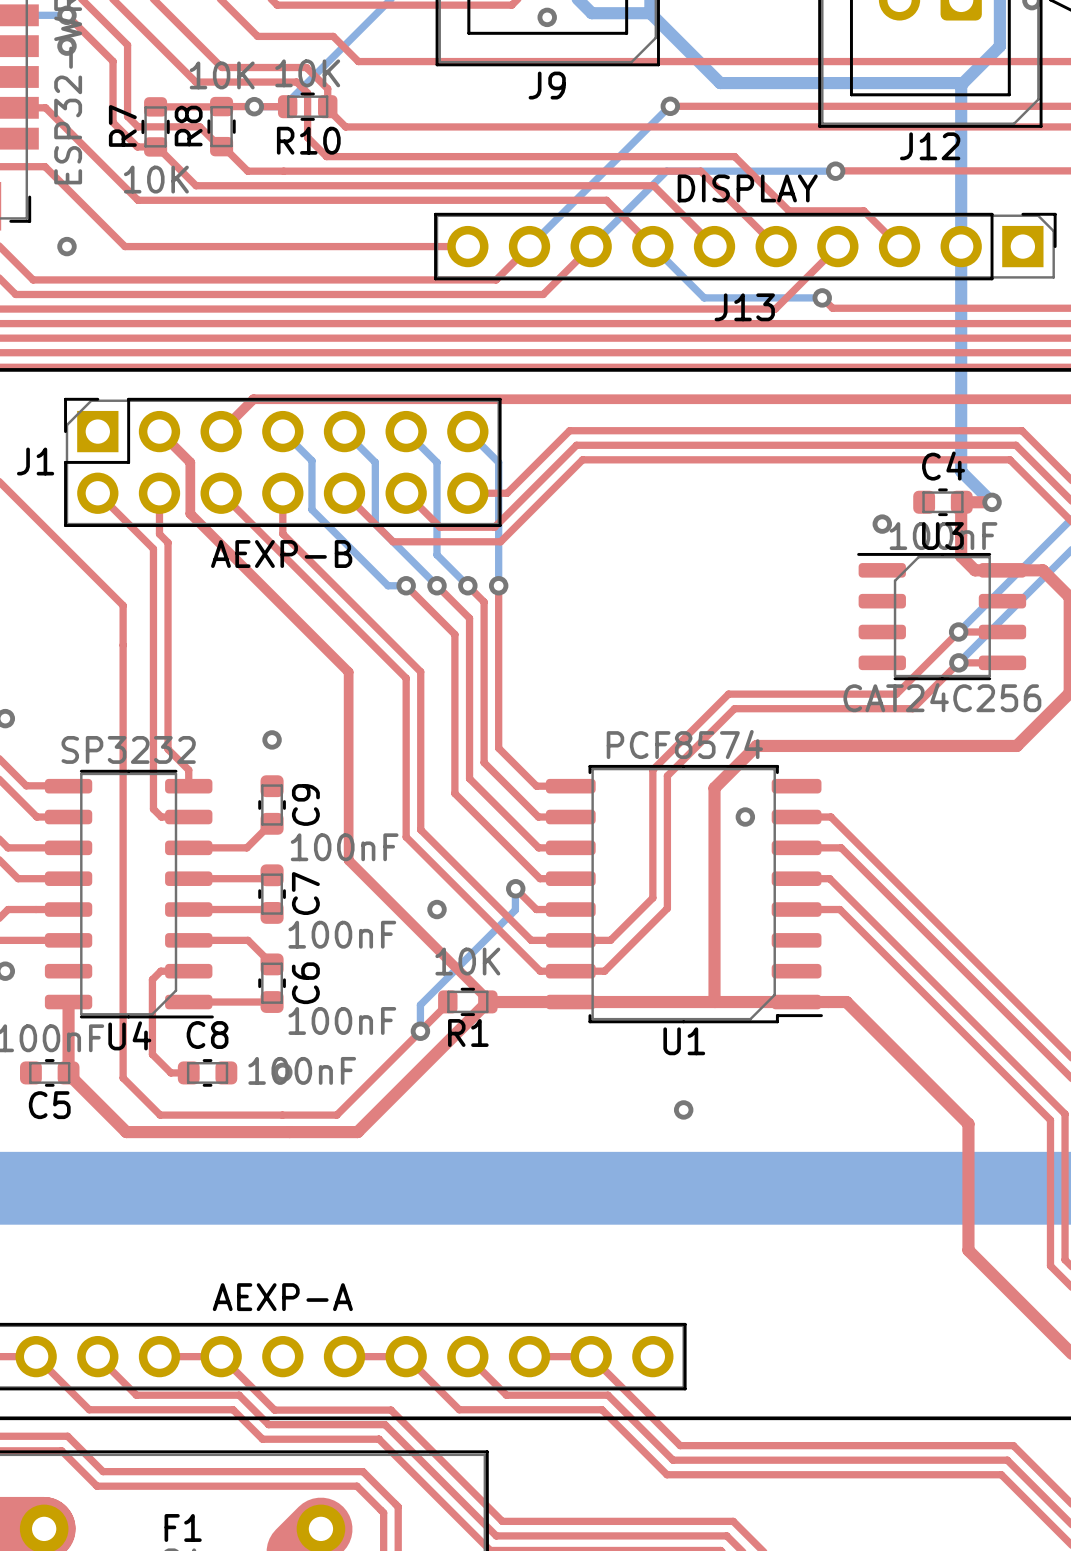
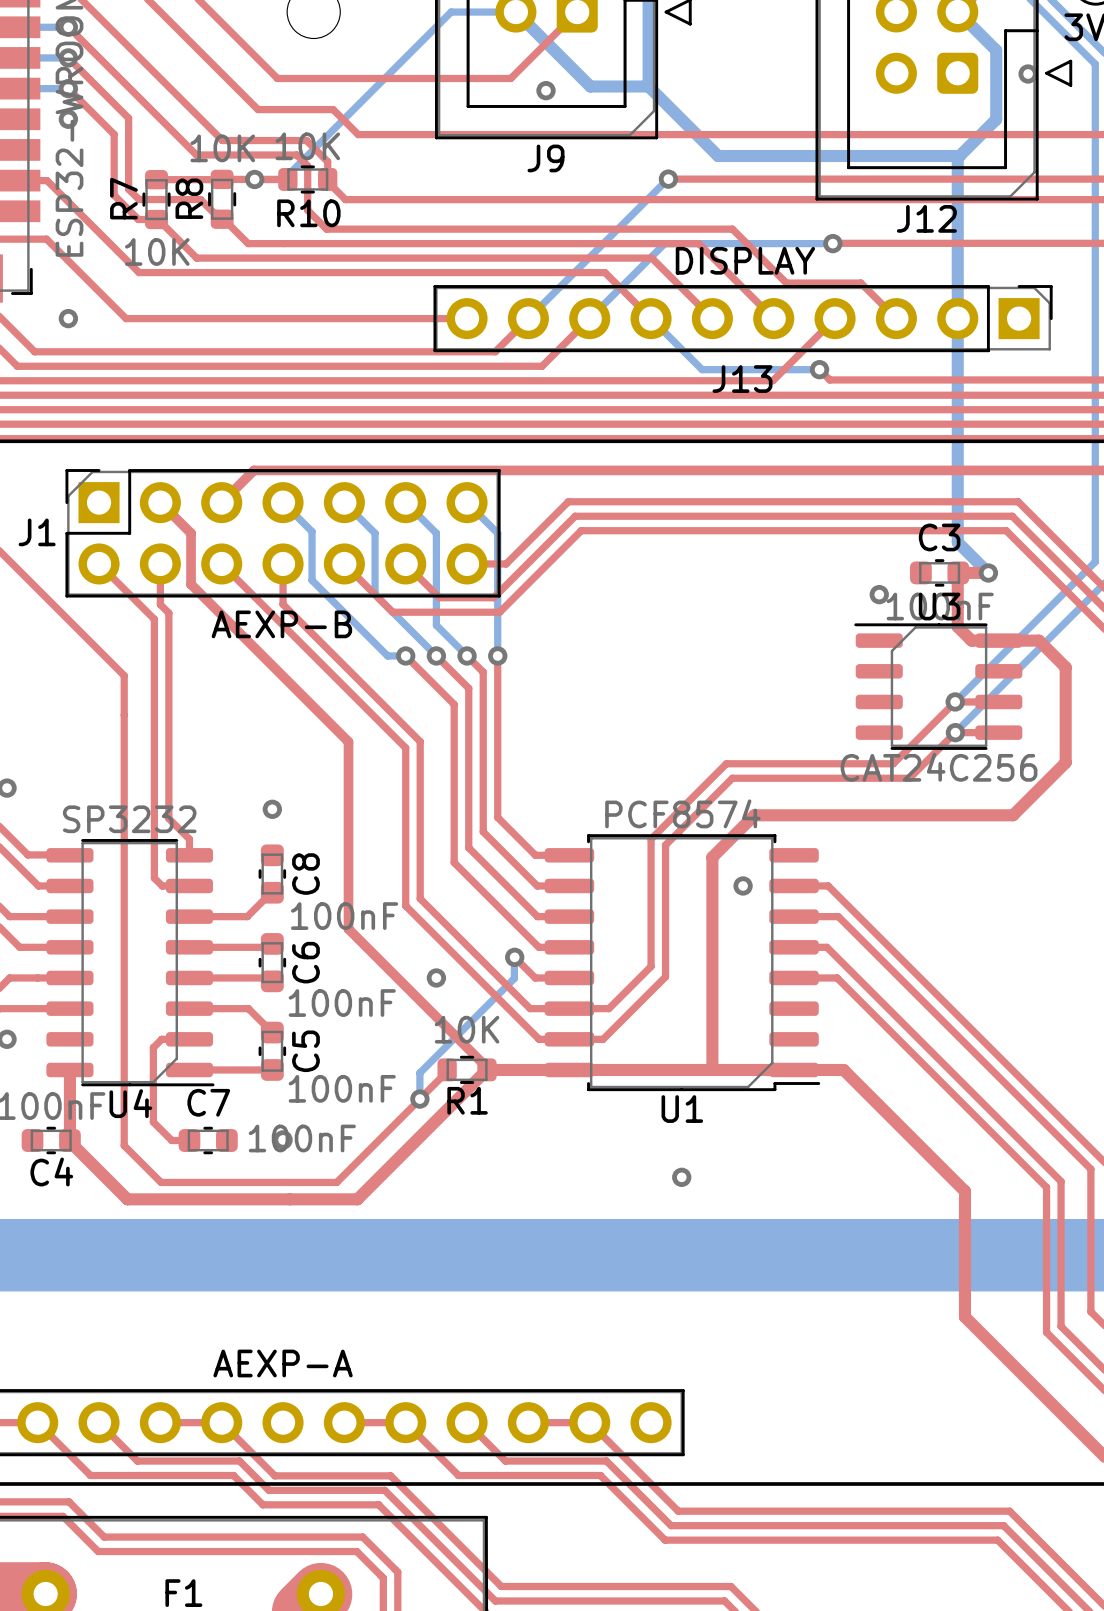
C4 name: C4 (943, 466) -> C3 (939, 537)
C9 name: C9 (305, 805) -> C8 (305, 874)
C7 name: C7 (305, 893) -> C6 (305, 962)
C6 name: C6 (305, 983) -> C5 (305, 1051)
C8 name: C8 (207, 1035) -> C7 (208, 1102)
C5 name: C5 (49, 1105) -> C4 (51, 1171)

